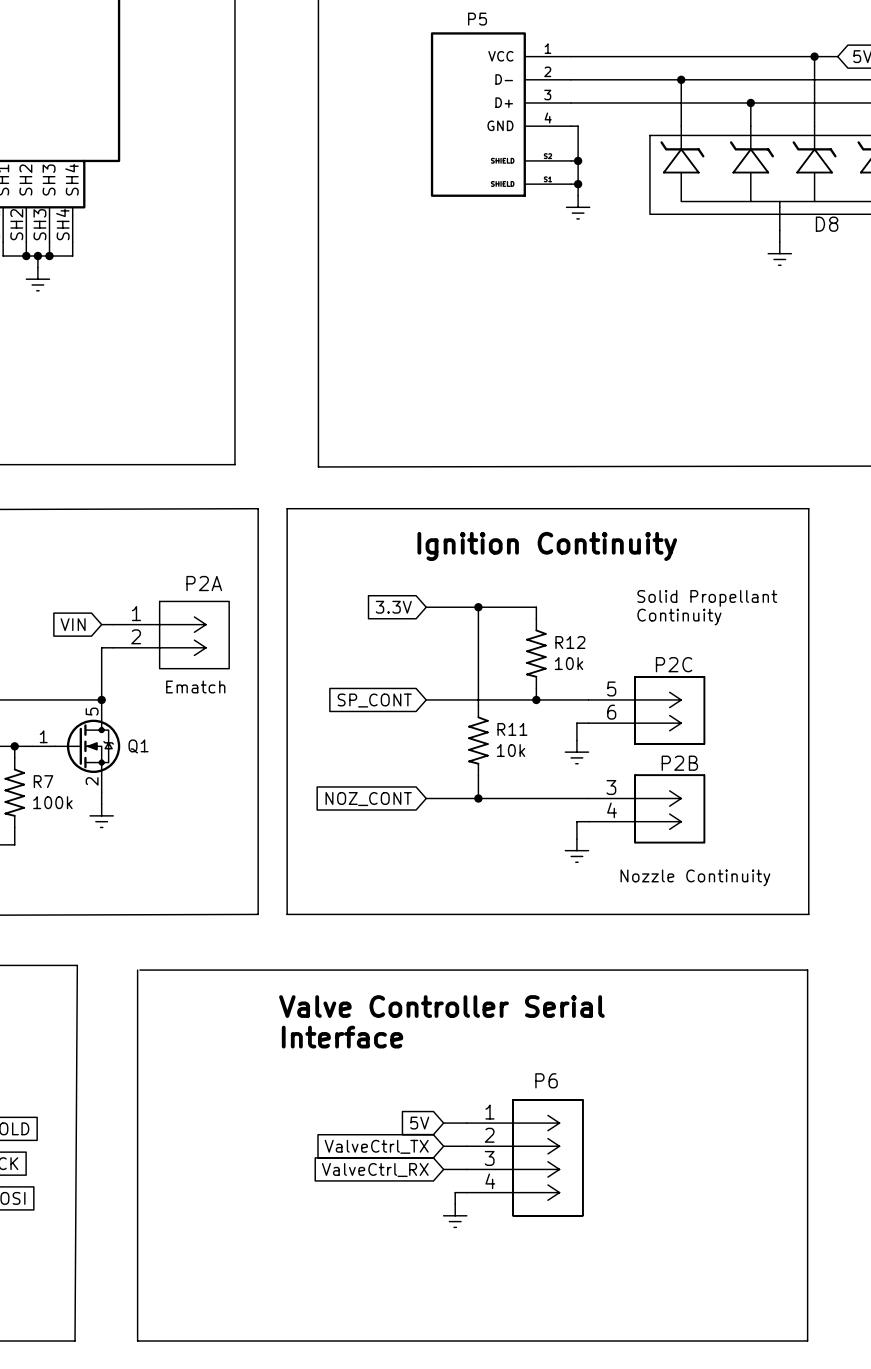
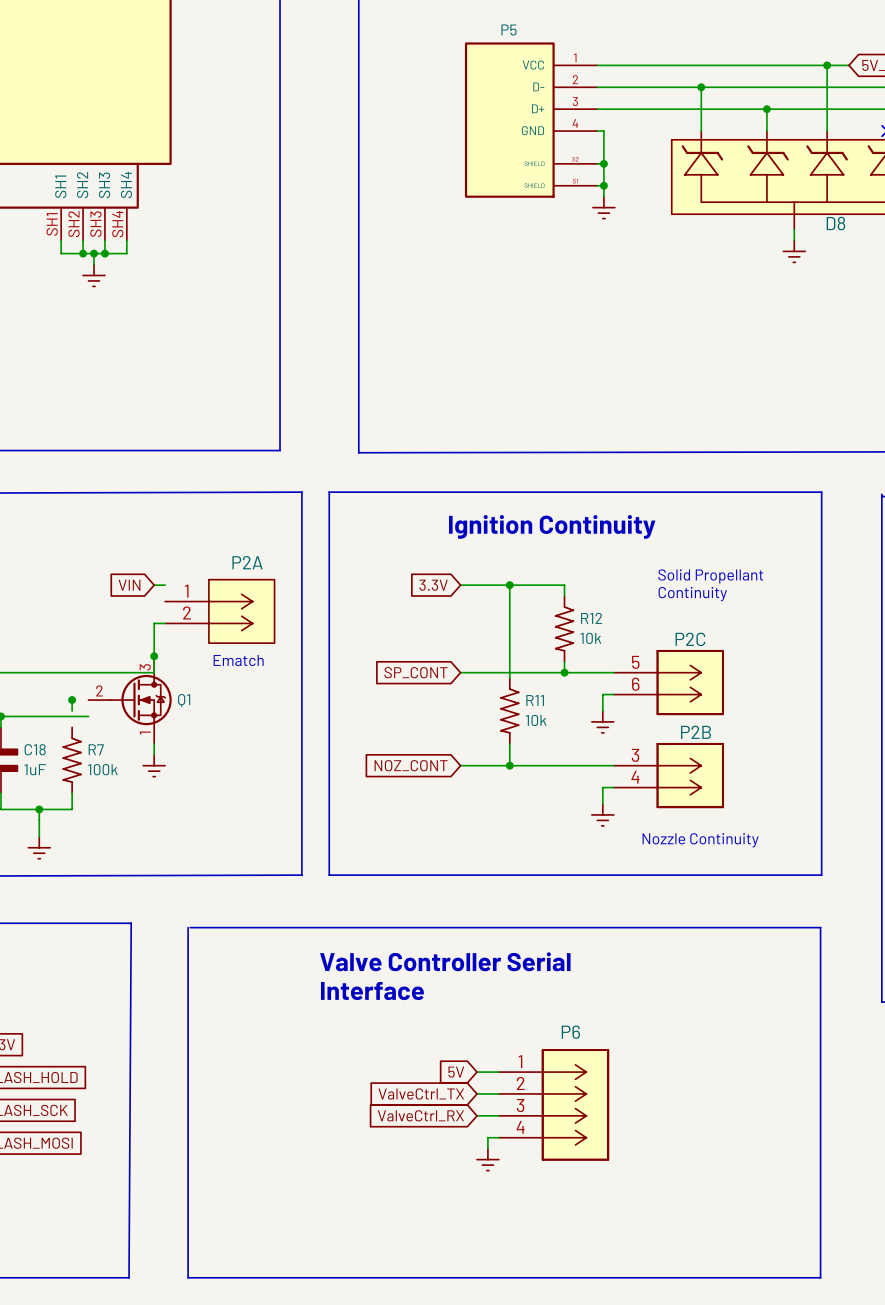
global label position: VIN (73, 624) -> VIN (129, 585)
wire: (101, 624) (113, 624) -> (154, 585) (165, 585)
junction position: (101, 699) -> (154, 656)
Q1 pin number: 5 (92, 711) -> 3 (145, 667)
Q1 pin number: 1 (43, 736) -> 2 (99, 690)
wire: (14, 746) (14, 757) -> (72, 700) (72, 710)
junction position: (14, 746) -> (72, 700)
Q1 position: (76, 746) -> (130, 700)
Q1 pin number: 2 (92, 781) -> 1 (145, 733)
power symbol position: (101, 815) -> (154, 765)

